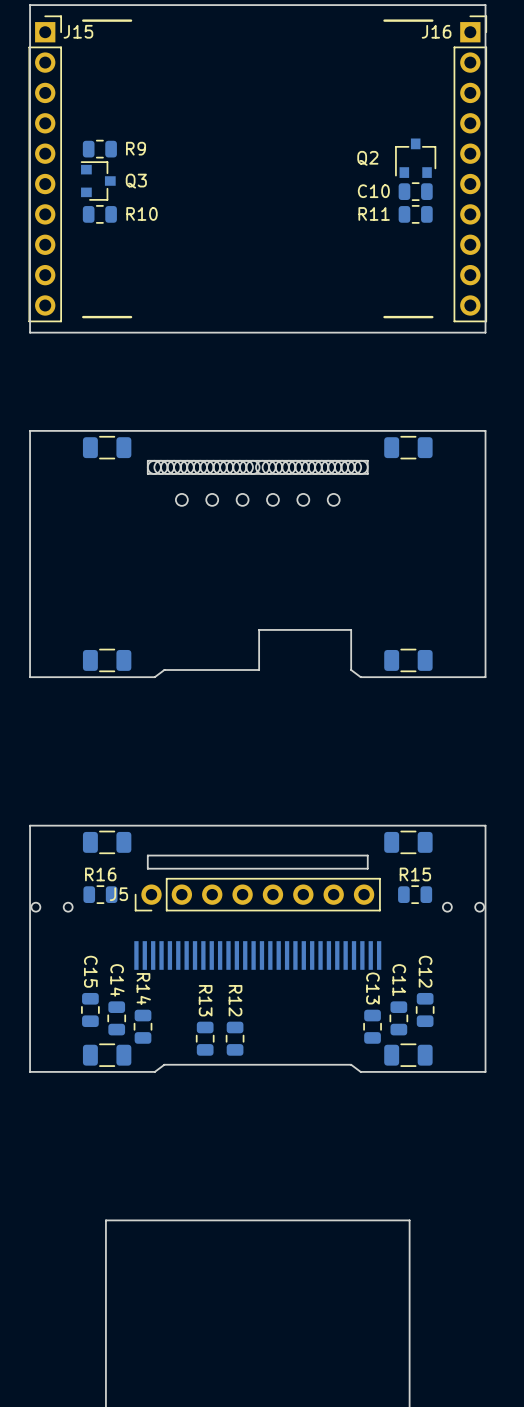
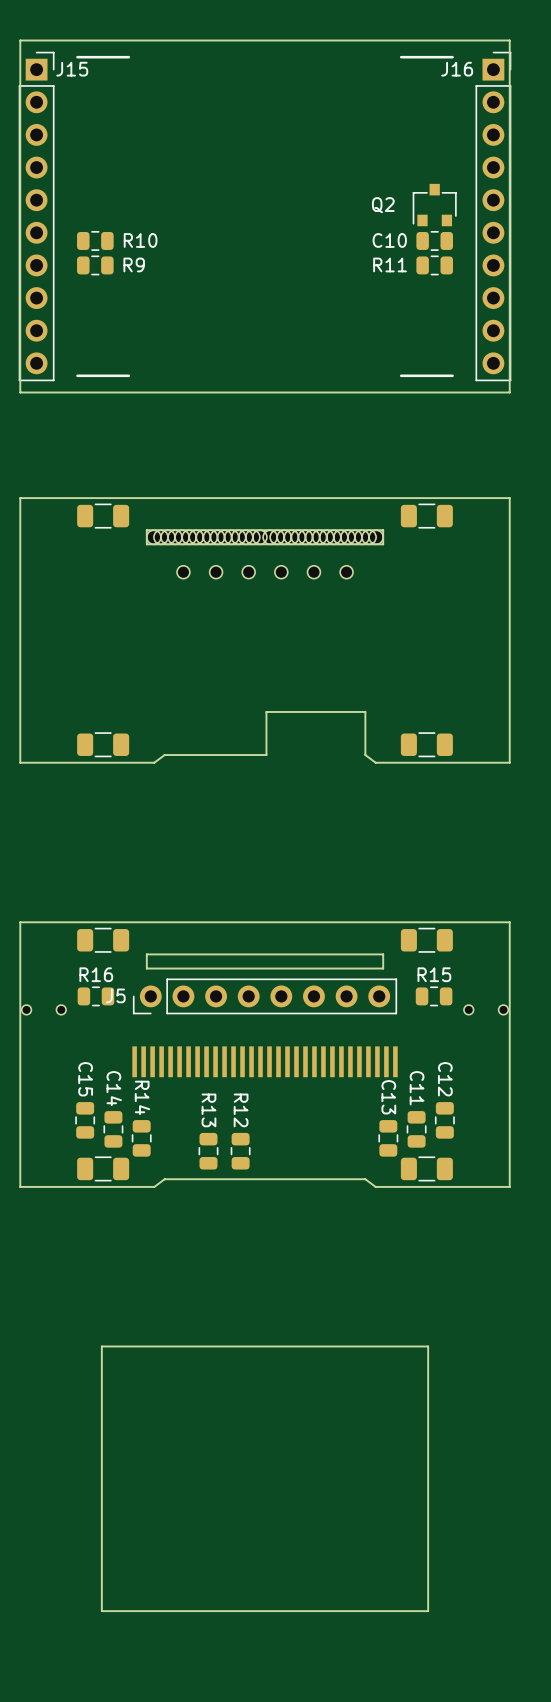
R9: (99, 149) -> none
Q3: (98, 181) -> none
R10: none -> (95, 240)
R10 name: R10 (142, 213) -> R9 (134, 264)

